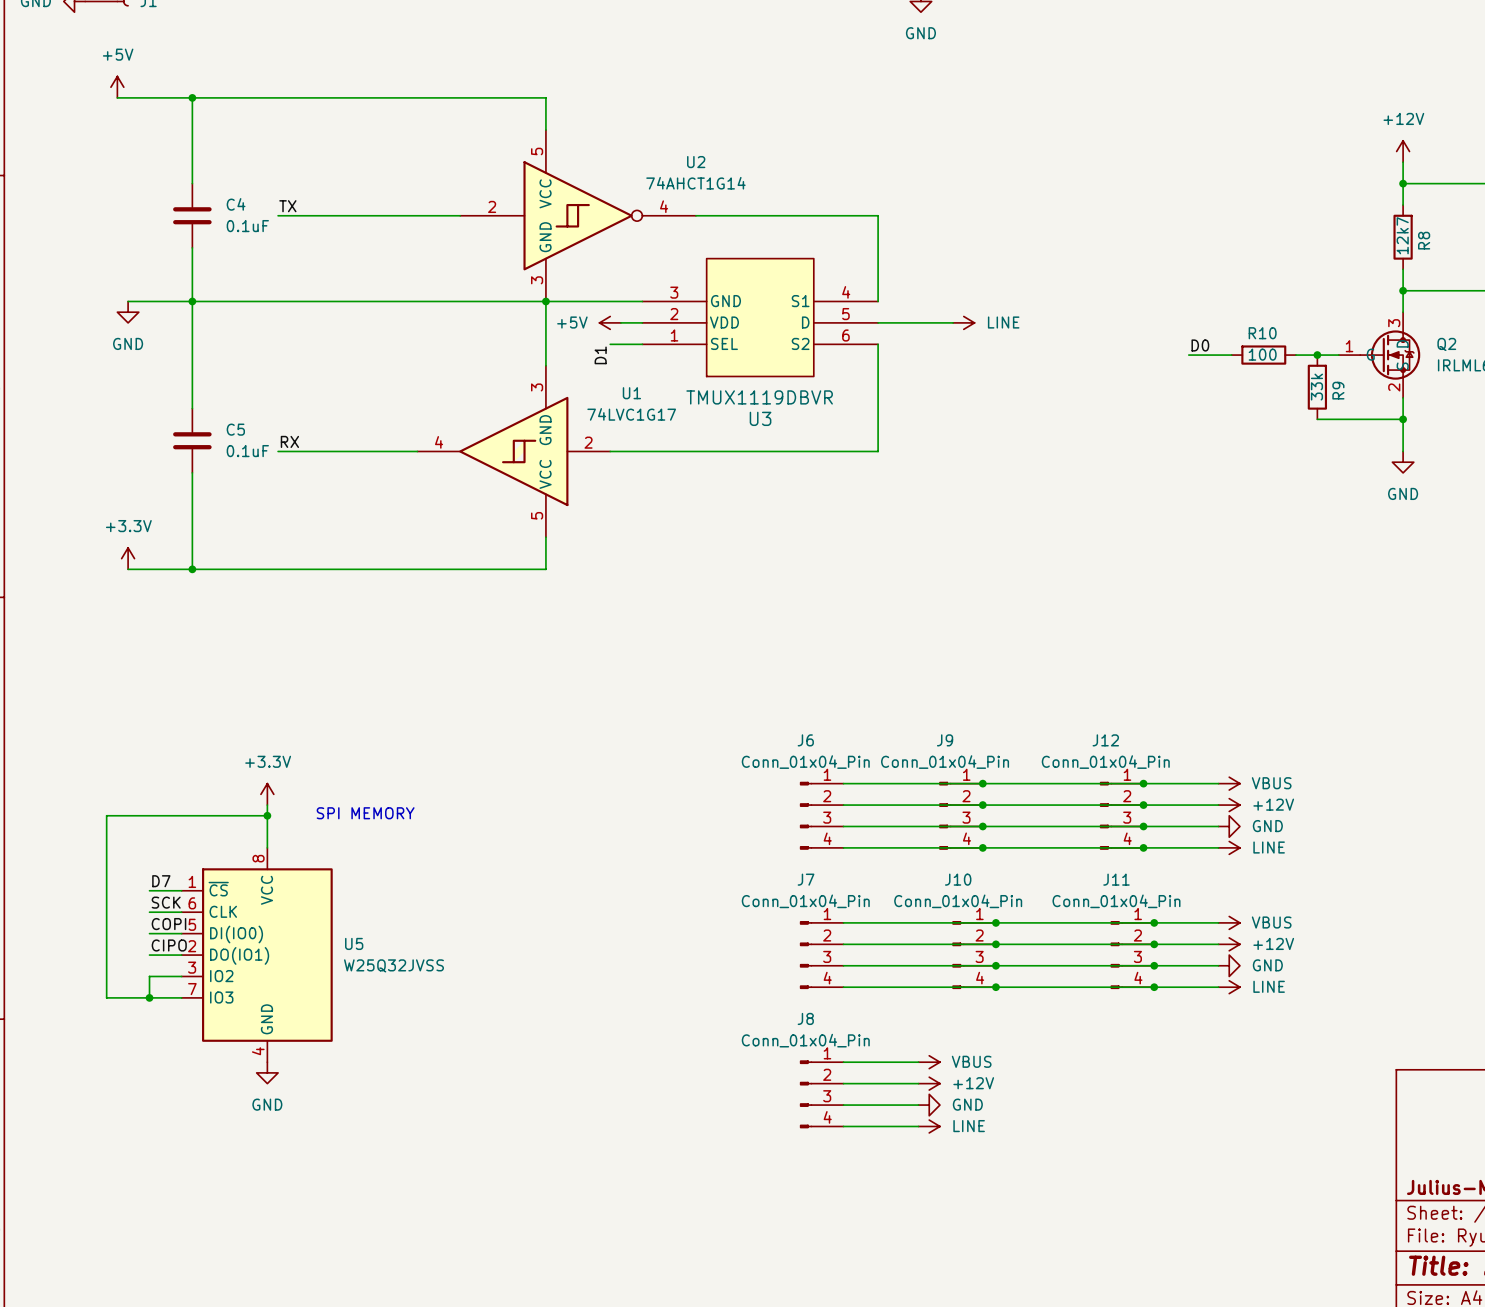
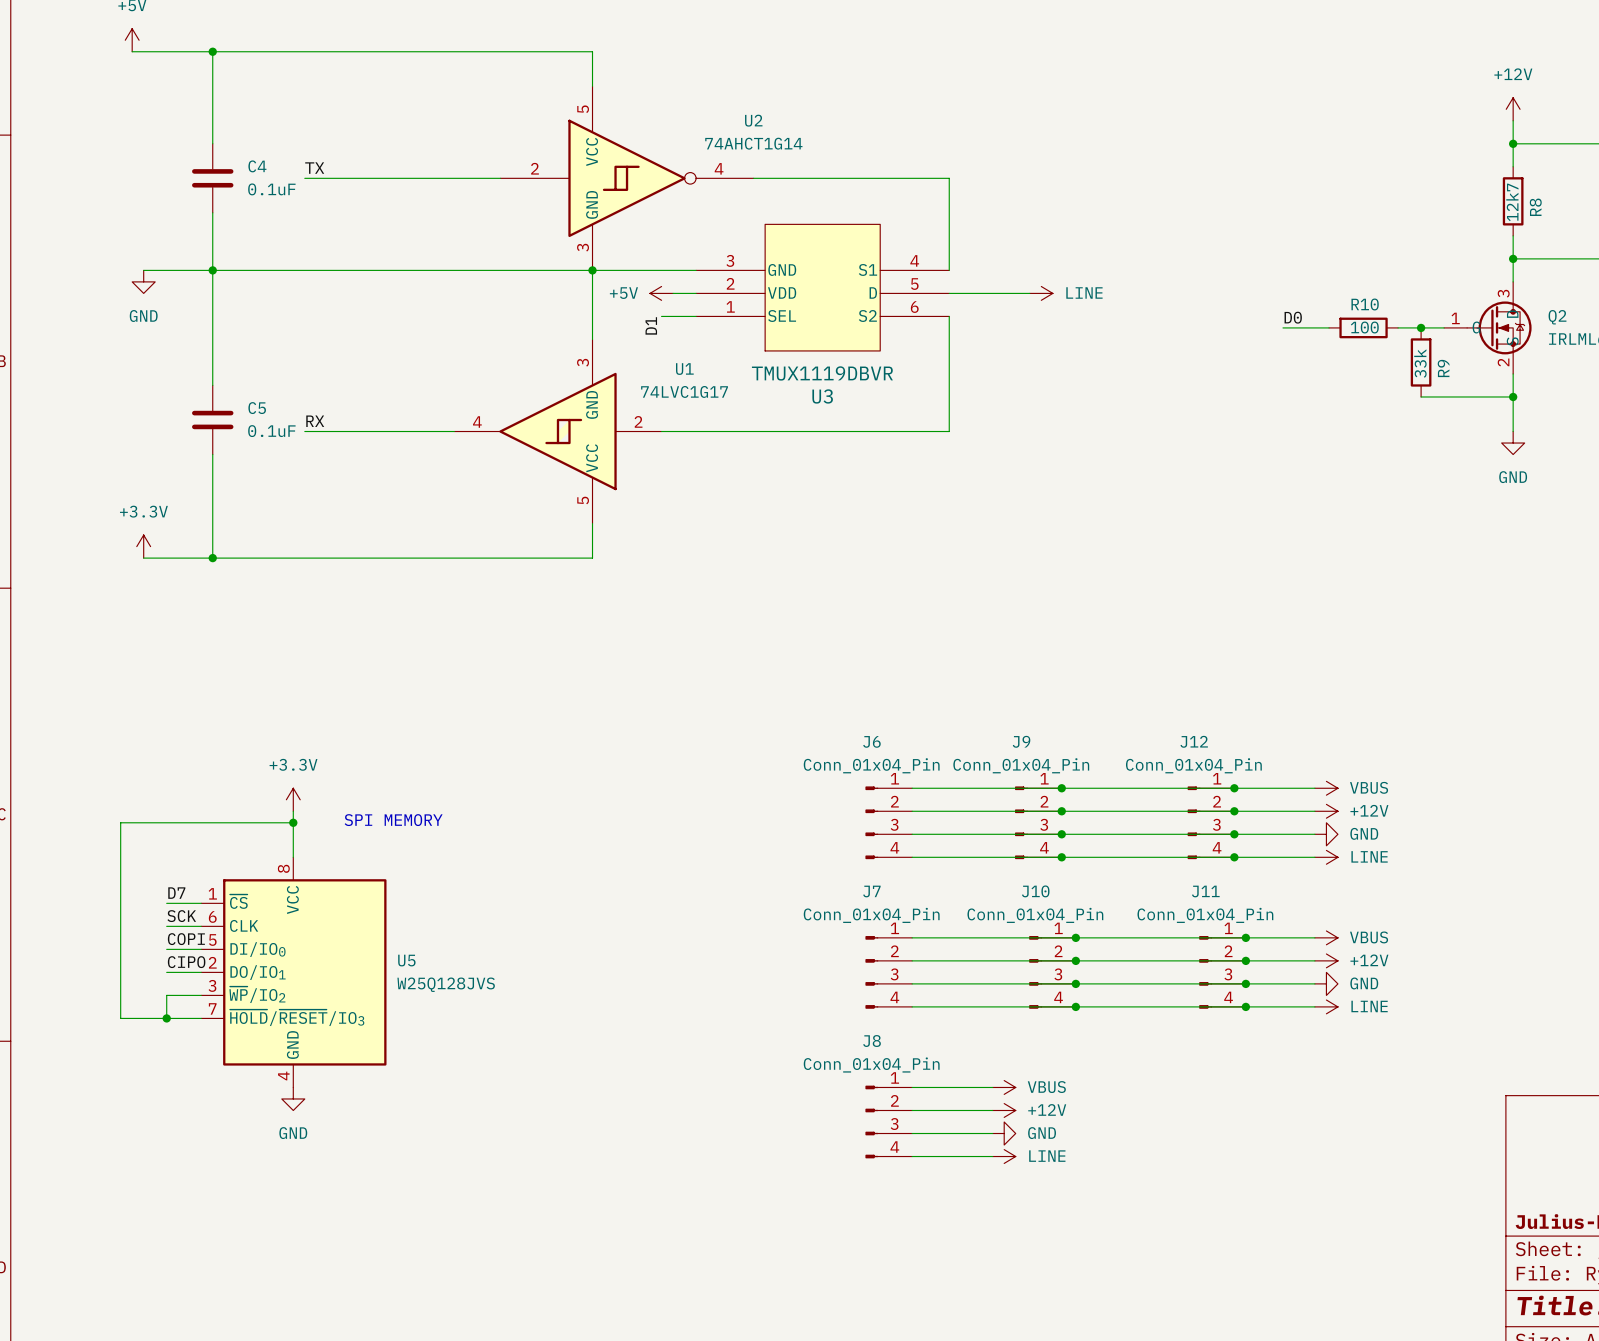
U5 symbol: [181, 847, 333, 1063] -> [201, 857, 387, 1088]
U5 value: W25Q32JVSS (393, 965) -> W25Q128JVS (446, 984)

